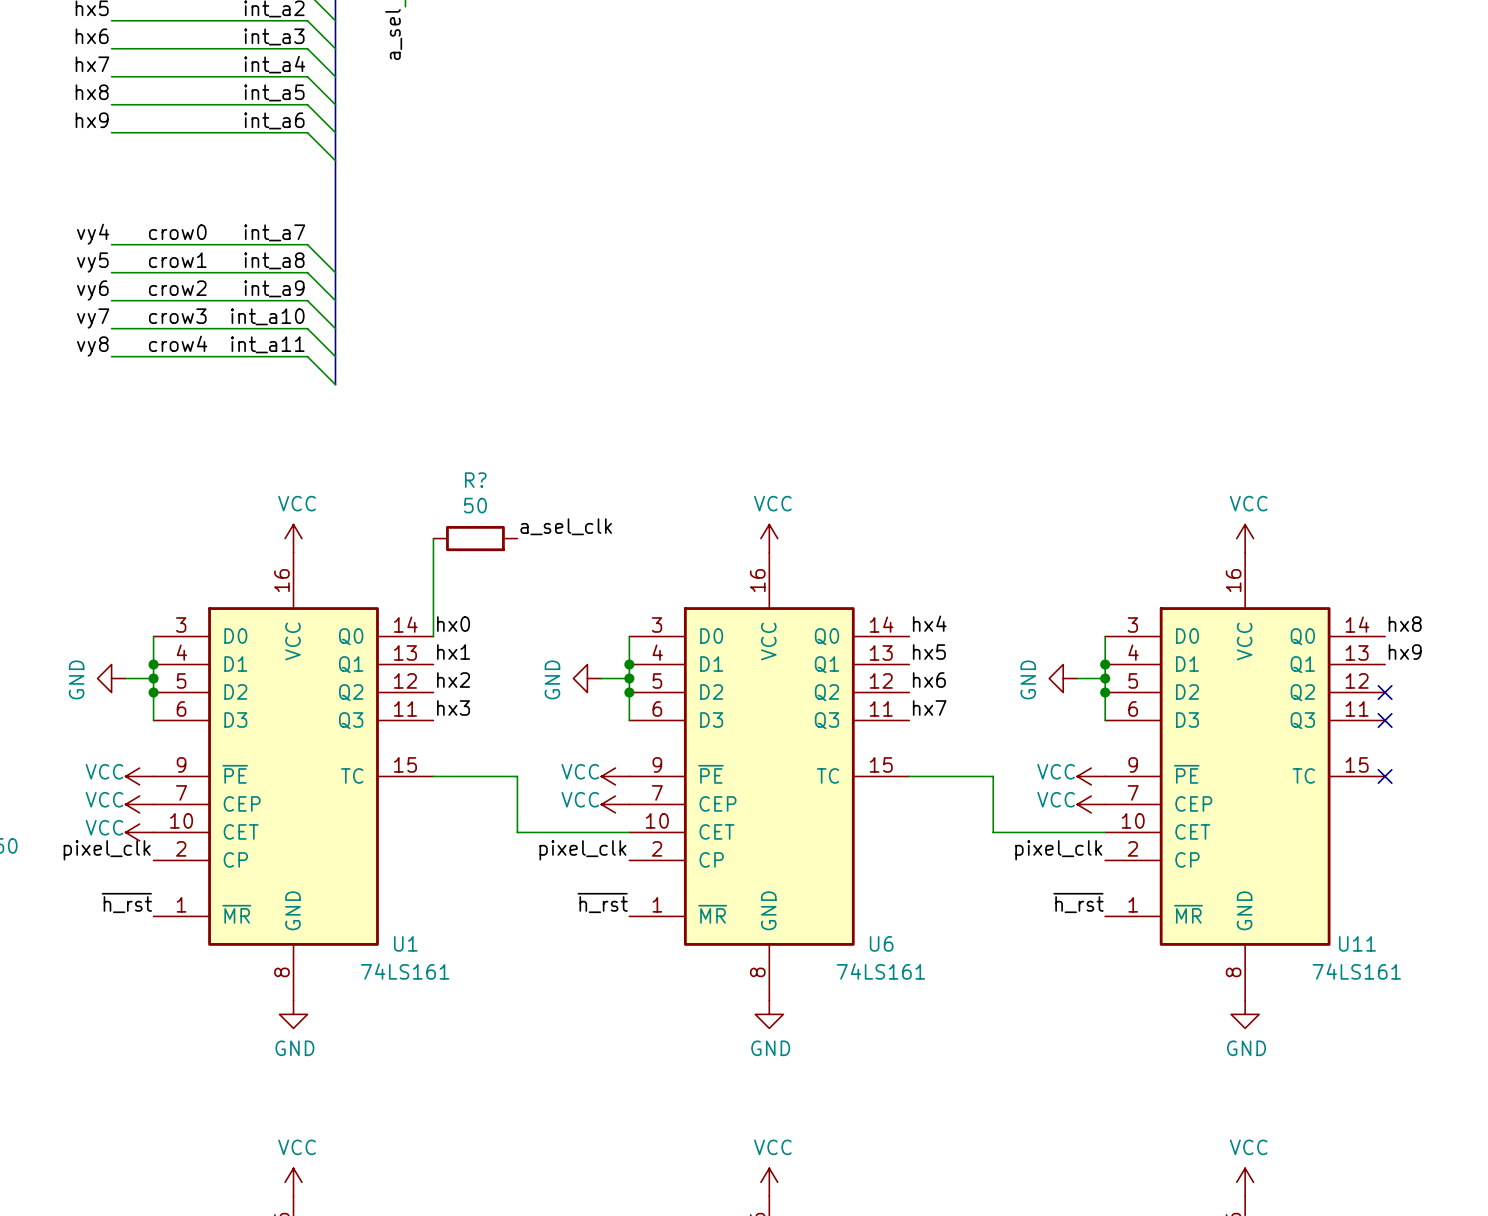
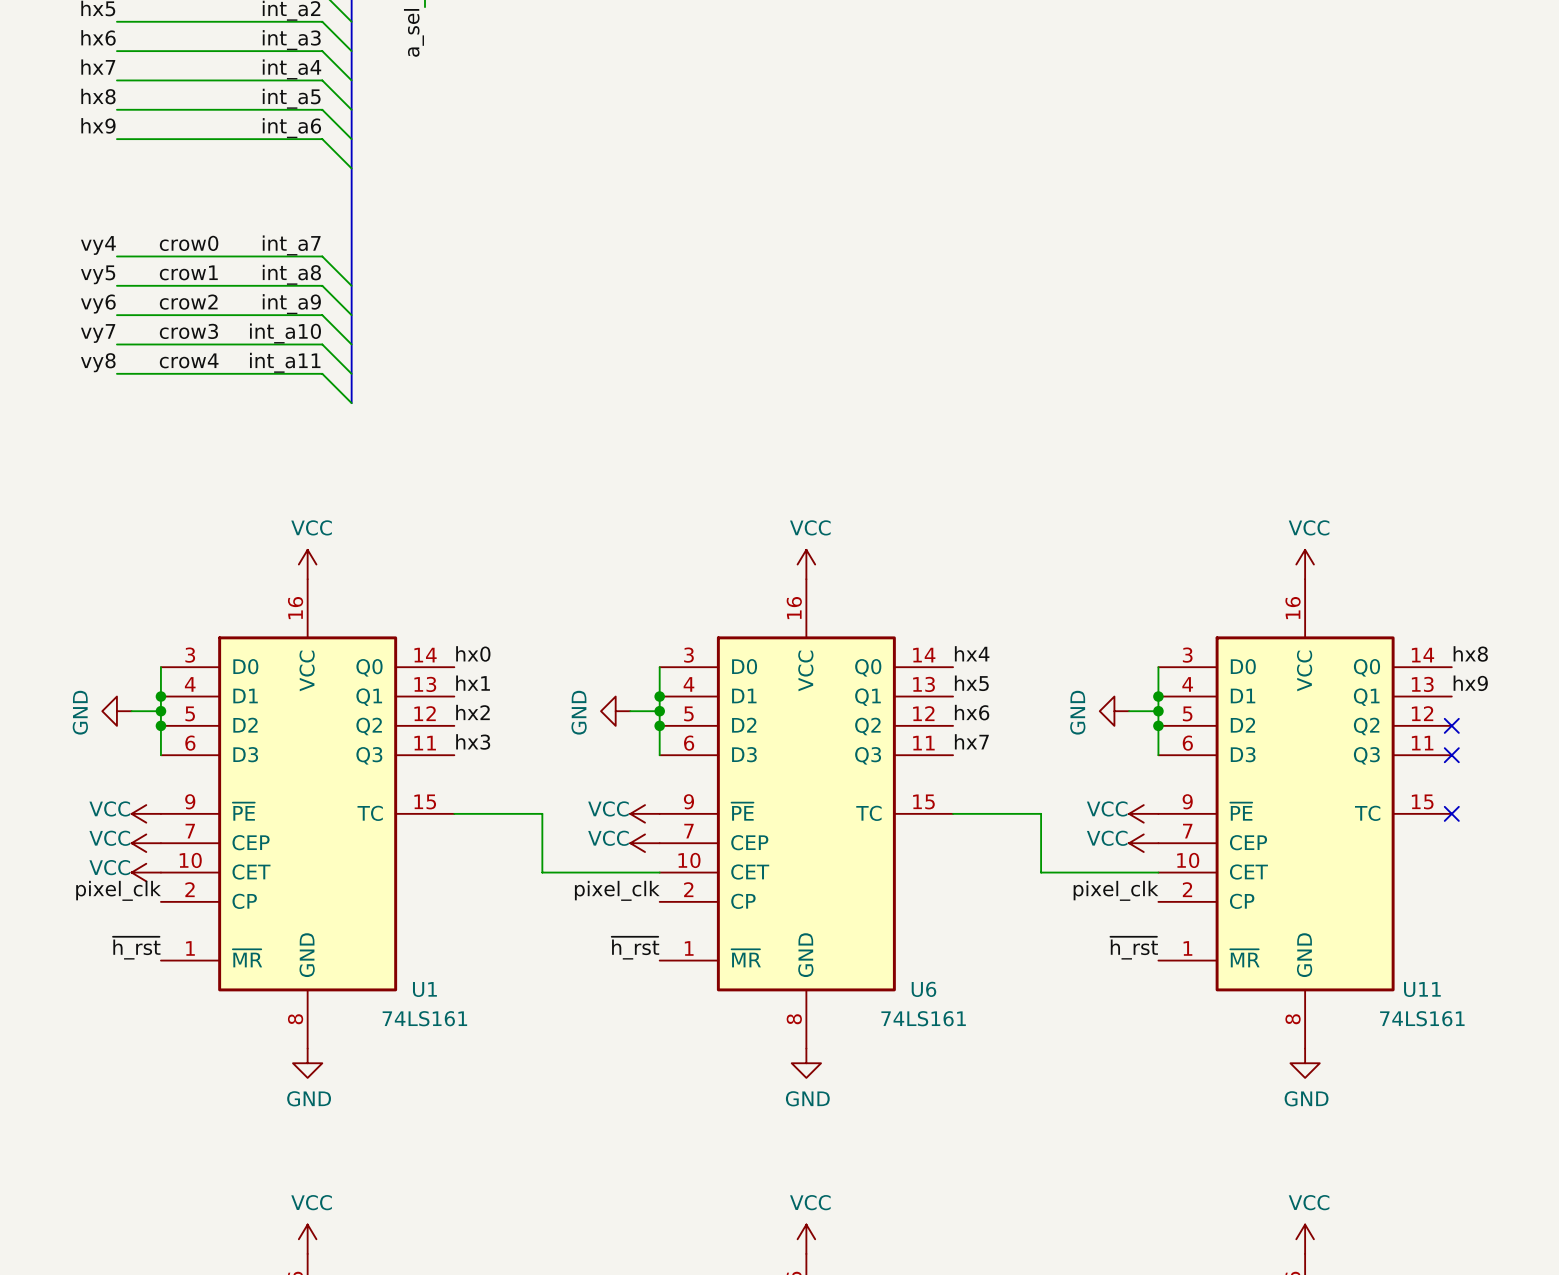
label: a_sel_clk (566, 526) -> none
wire: (433, 538) (433, 636) -> none
R?: 50 (475, 538) -> none

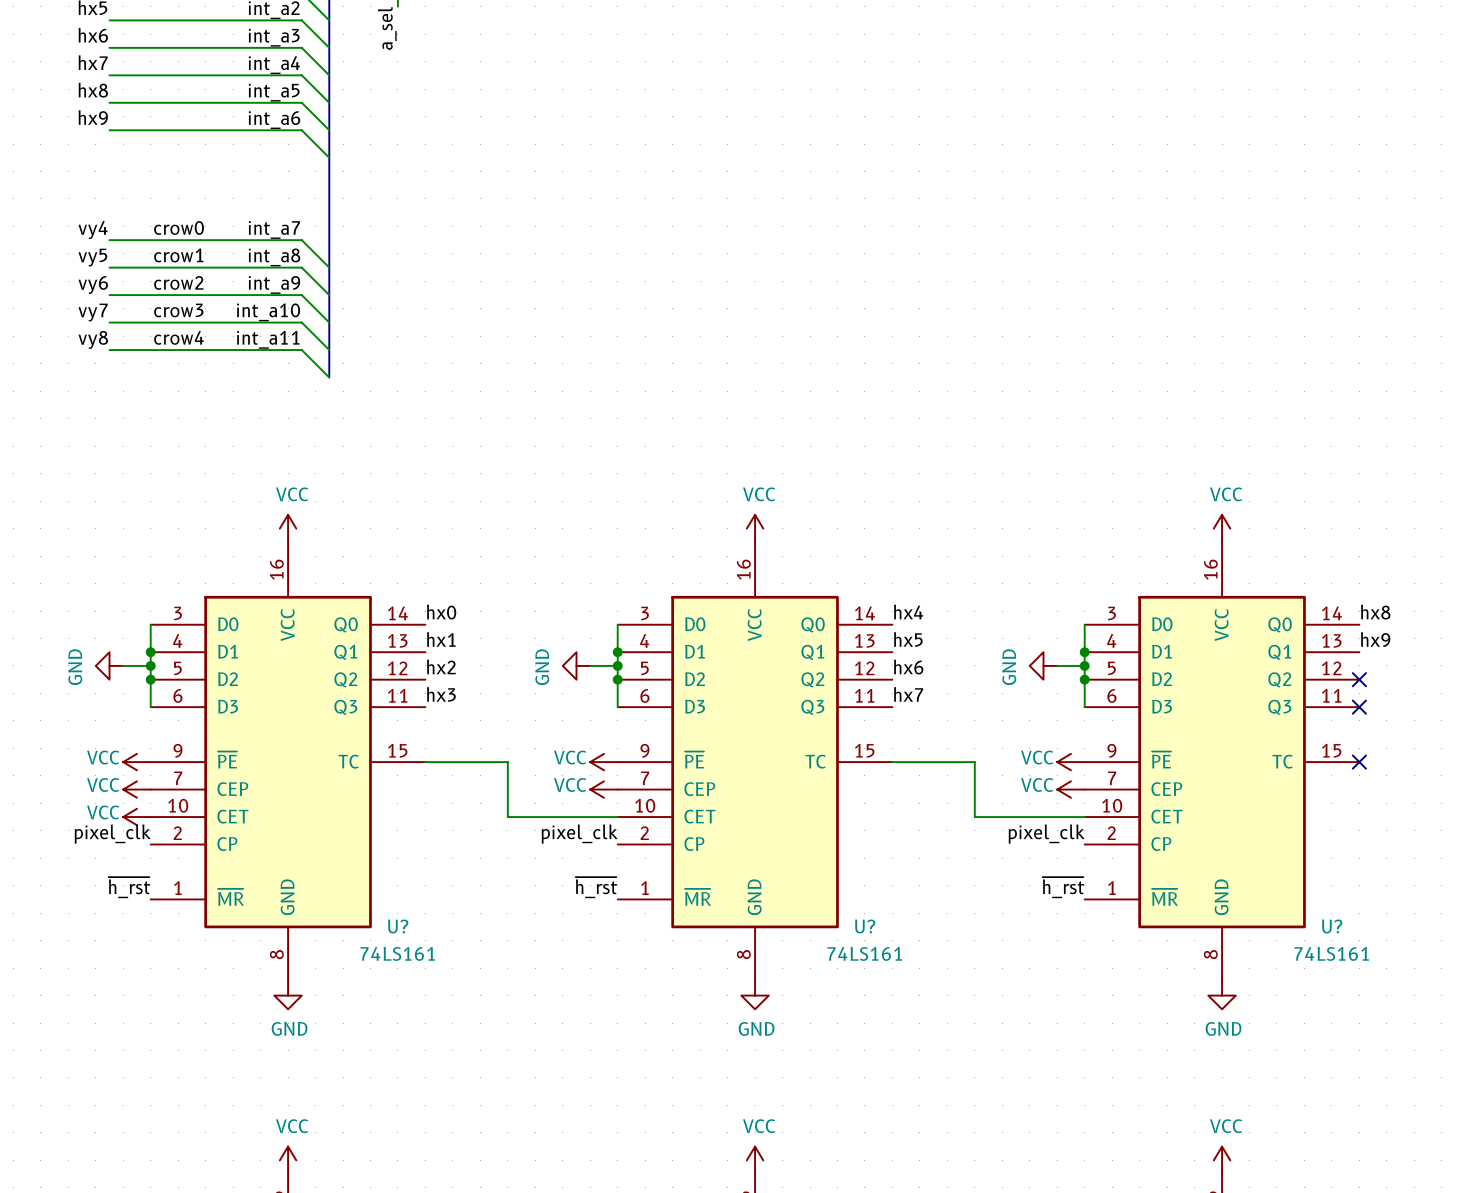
U1 name: U1 (424, 989) -> U? (398, 926)
U6 name: U6 (923, 989) -> U? (865, 926)
U11 name: U11 (1422, 989) -> U? (1332, 926)

